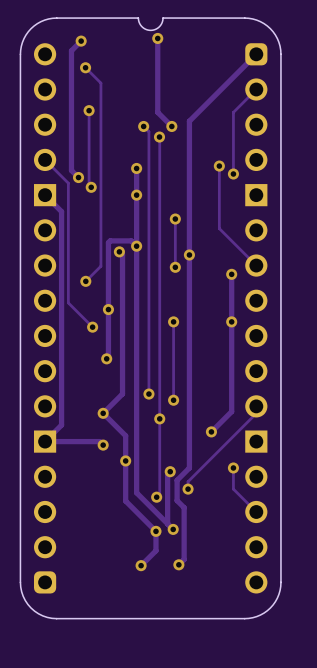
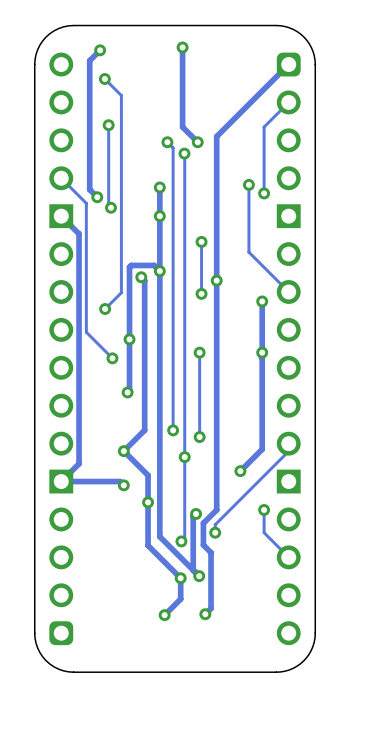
part footprint: [19, 17, 282, 620] -> [33, 24, 317, 673]

